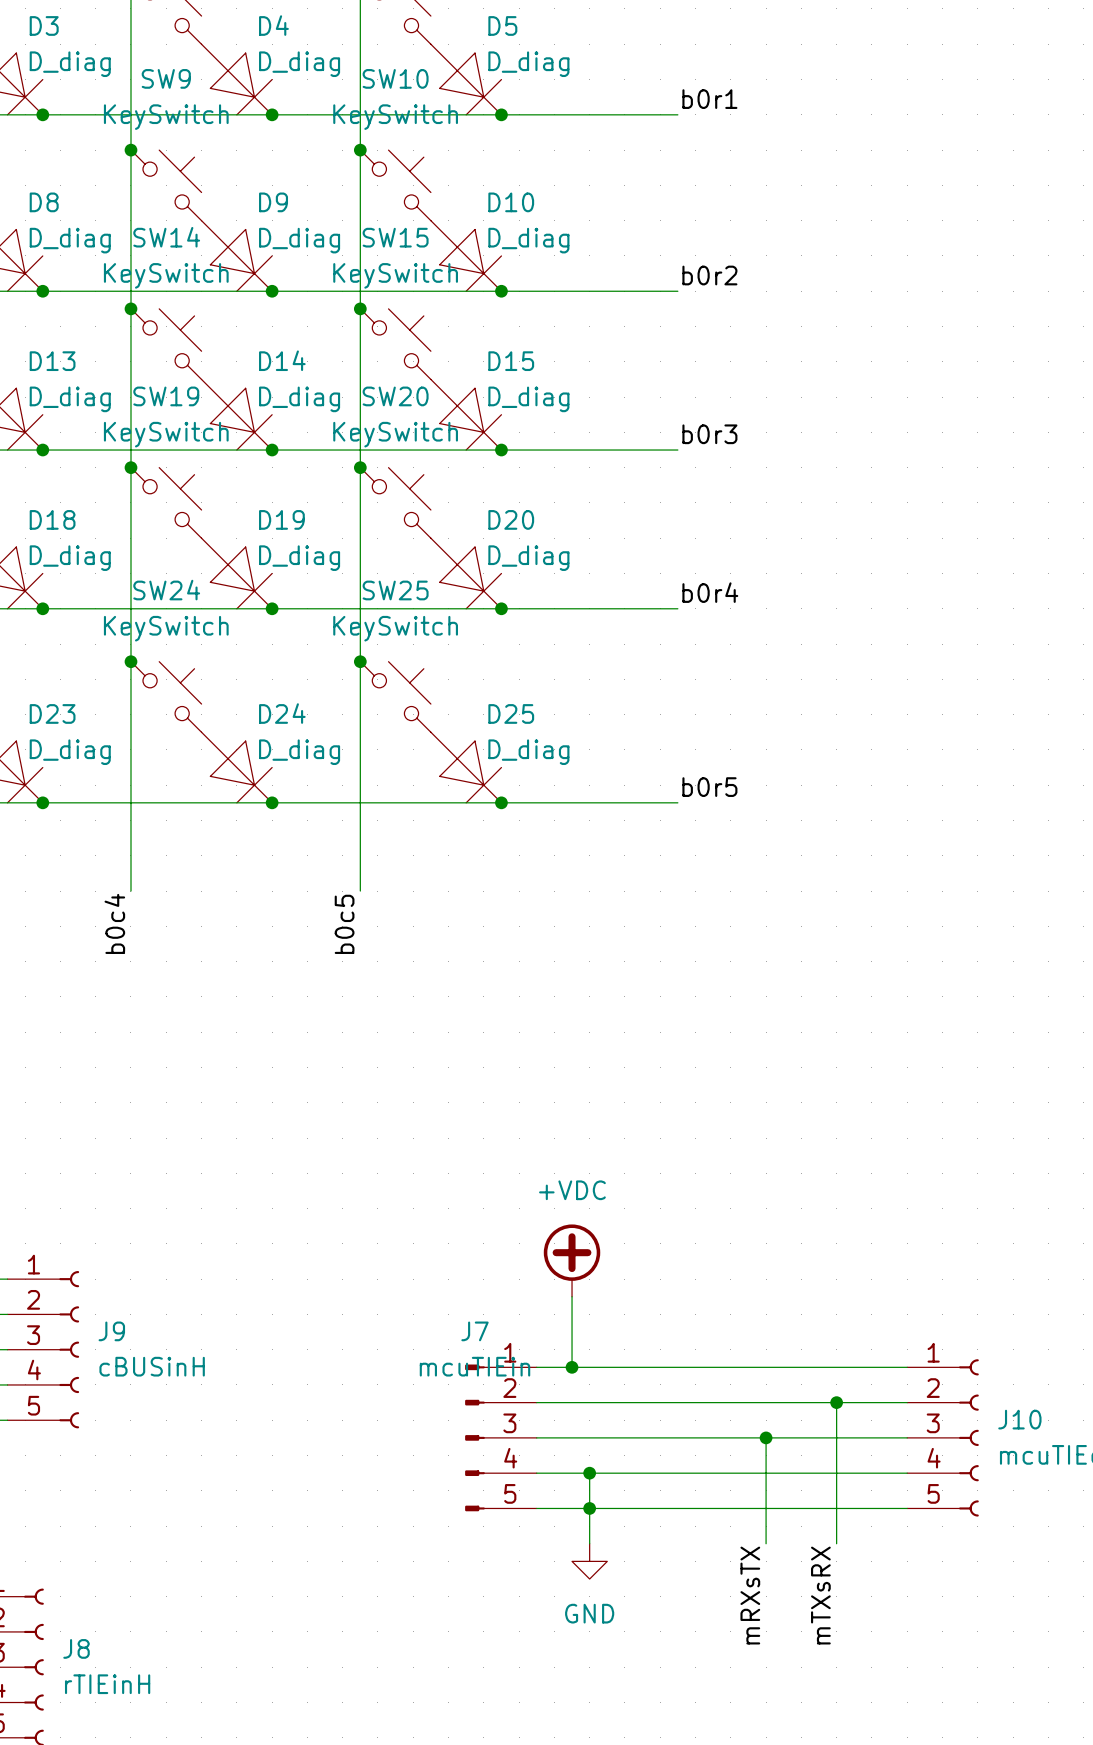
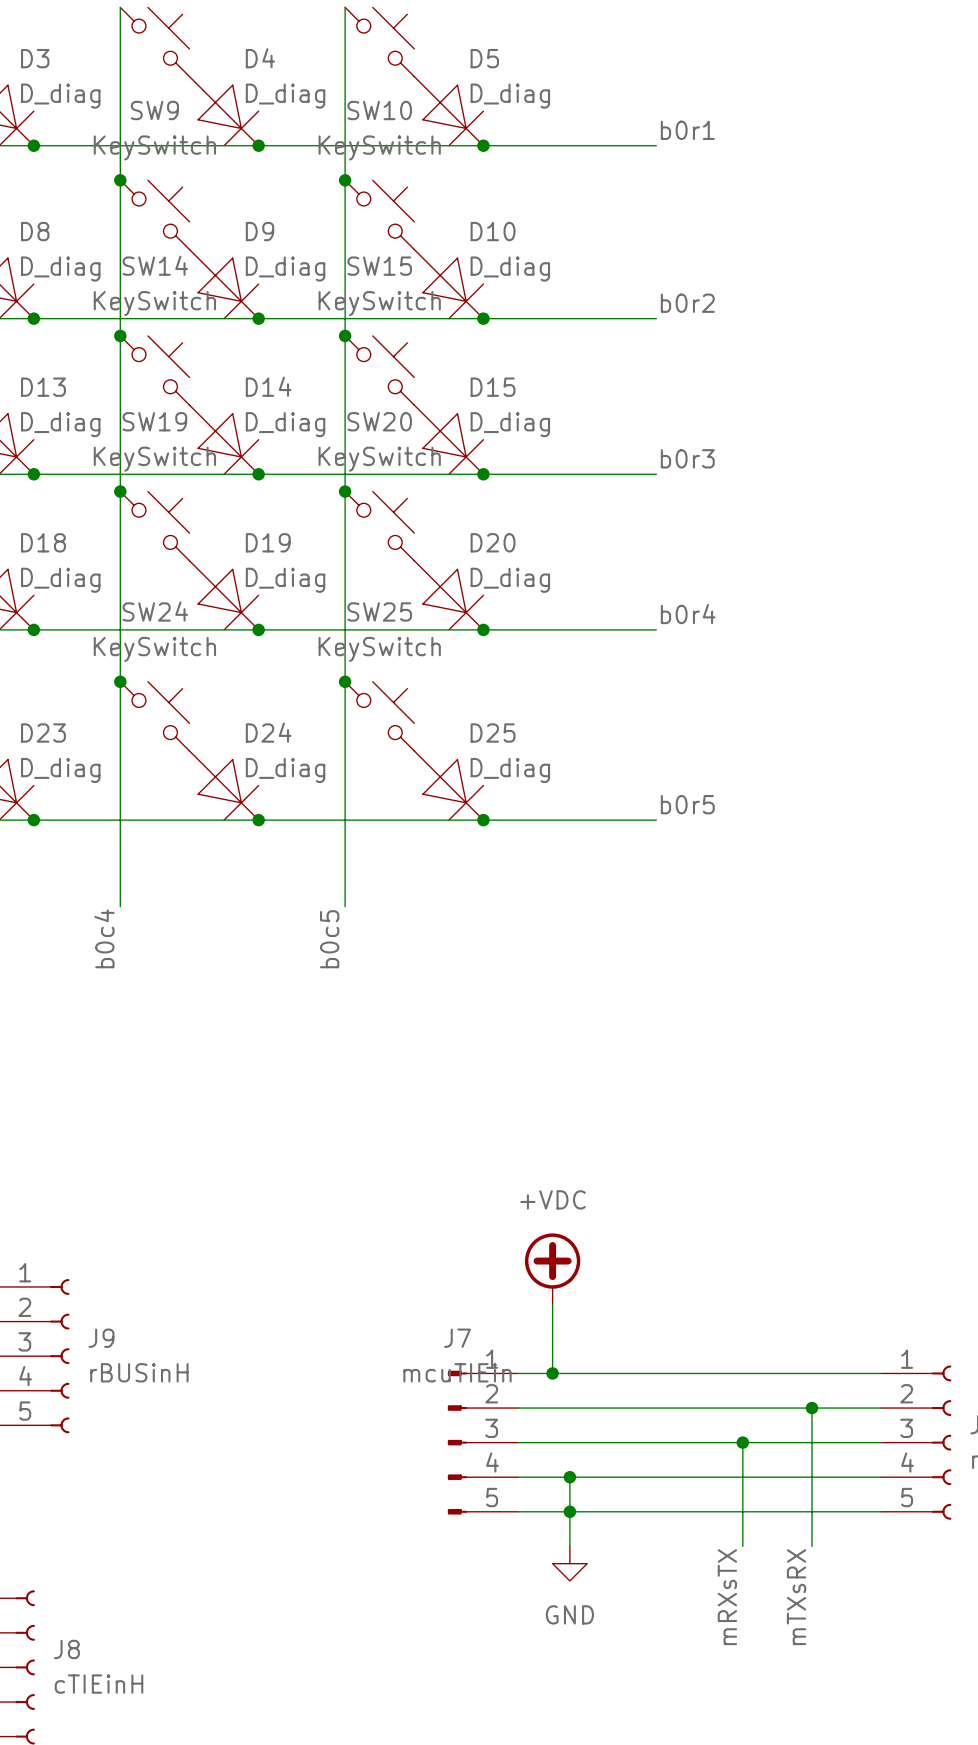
J9 value: cBUSinH (152, 1366) -> rBUSinH (139, 1372)
J8 value: rTIEinH (107, 1684) -> cTIEinH (99, 1684)

